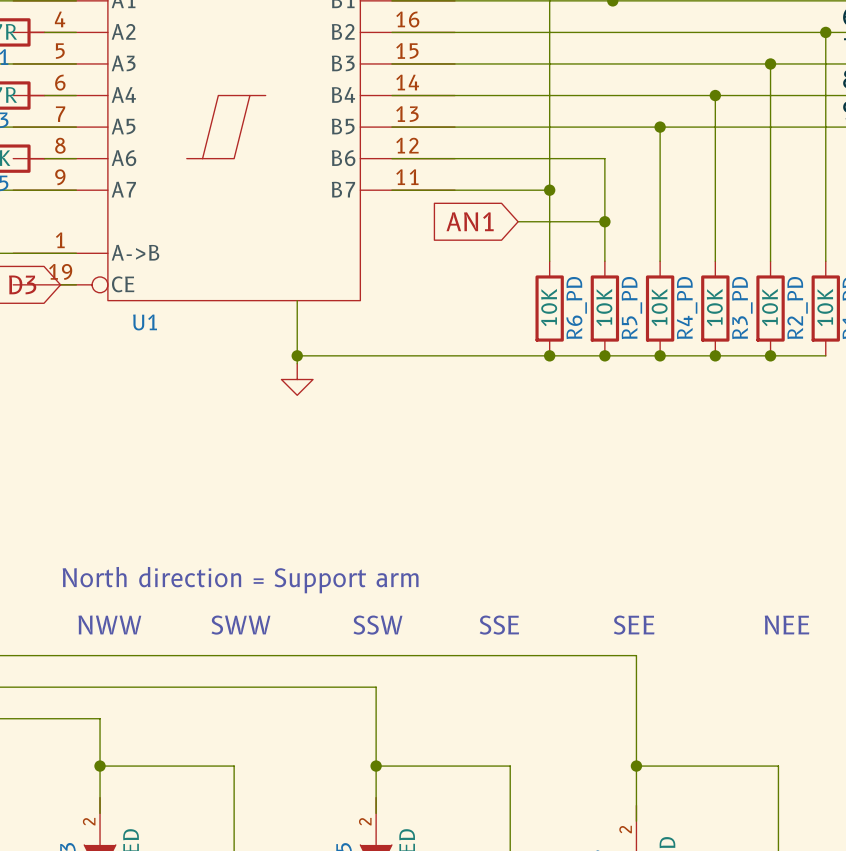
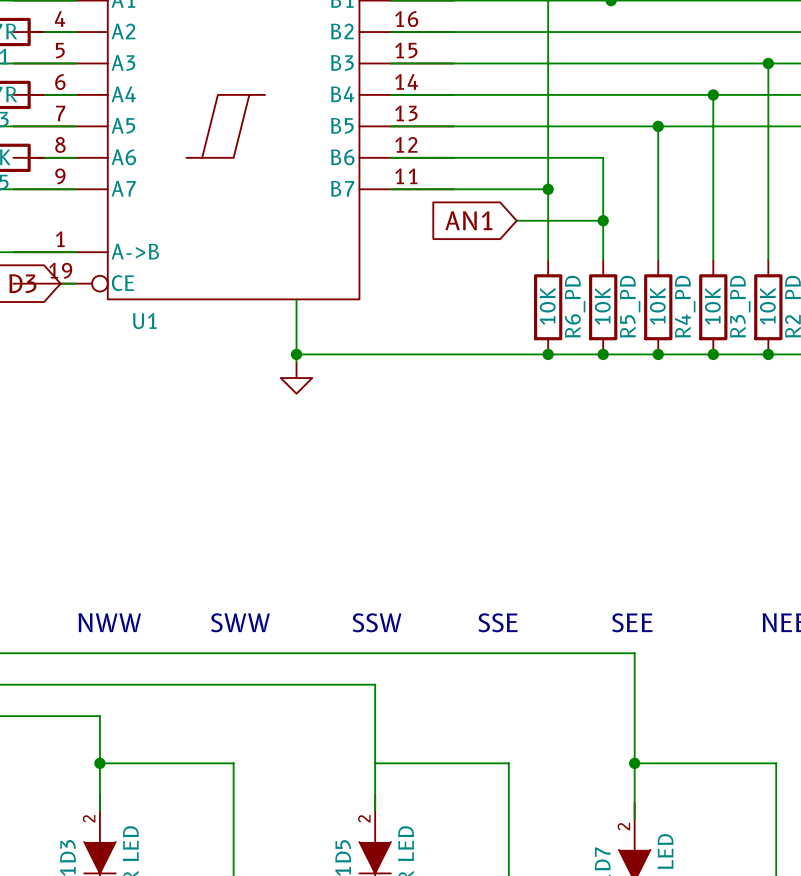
text: North direction = Support arm (240, 580) -> none
junction: (376, 766) -> none

